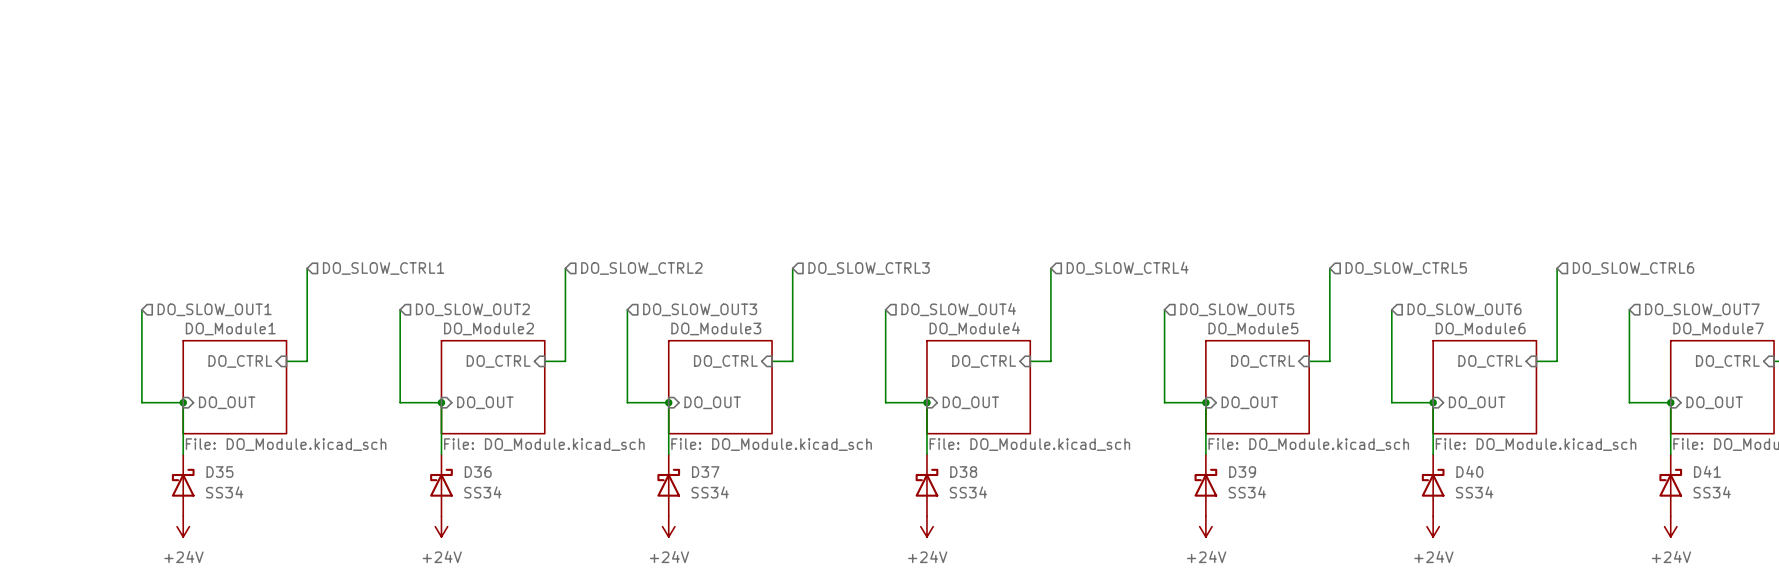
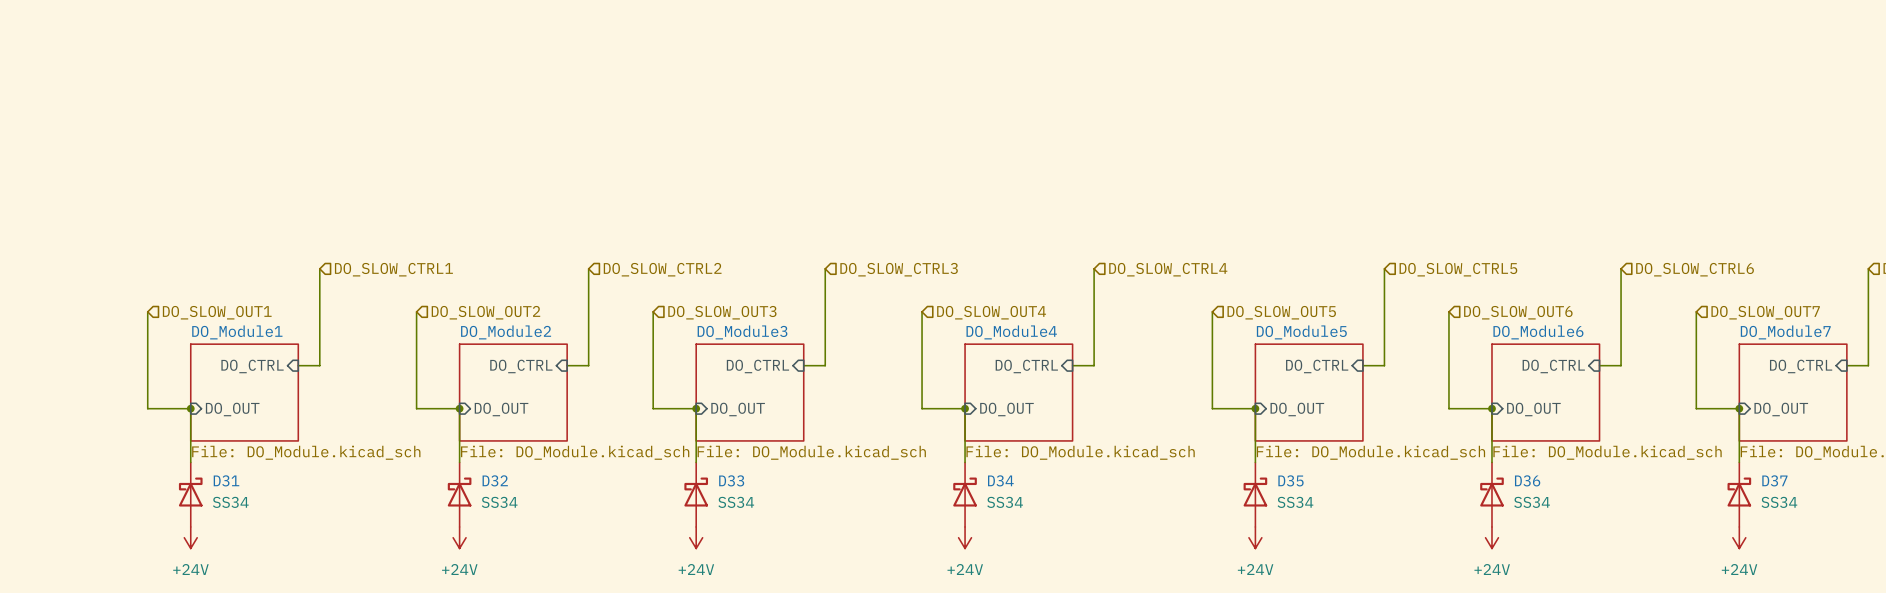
D40 name: D40 (1469, 471) -> D36 (1527, 480)
D41 name: D41 (1707, 471) -> D37 (1774, 480)
D35 name: D35 (219, 472) -> D31 (226, 480)
D36 name: D36 (478, 472) -> D32 (495, 480)
D37 name: D37 (705, 472) -> D33 (731, 480)
D38 name: D38 (963, 472) -> D34 (1000, 480)
D39 name: D39 (1242, 472) -> D35 (1290, 480)

